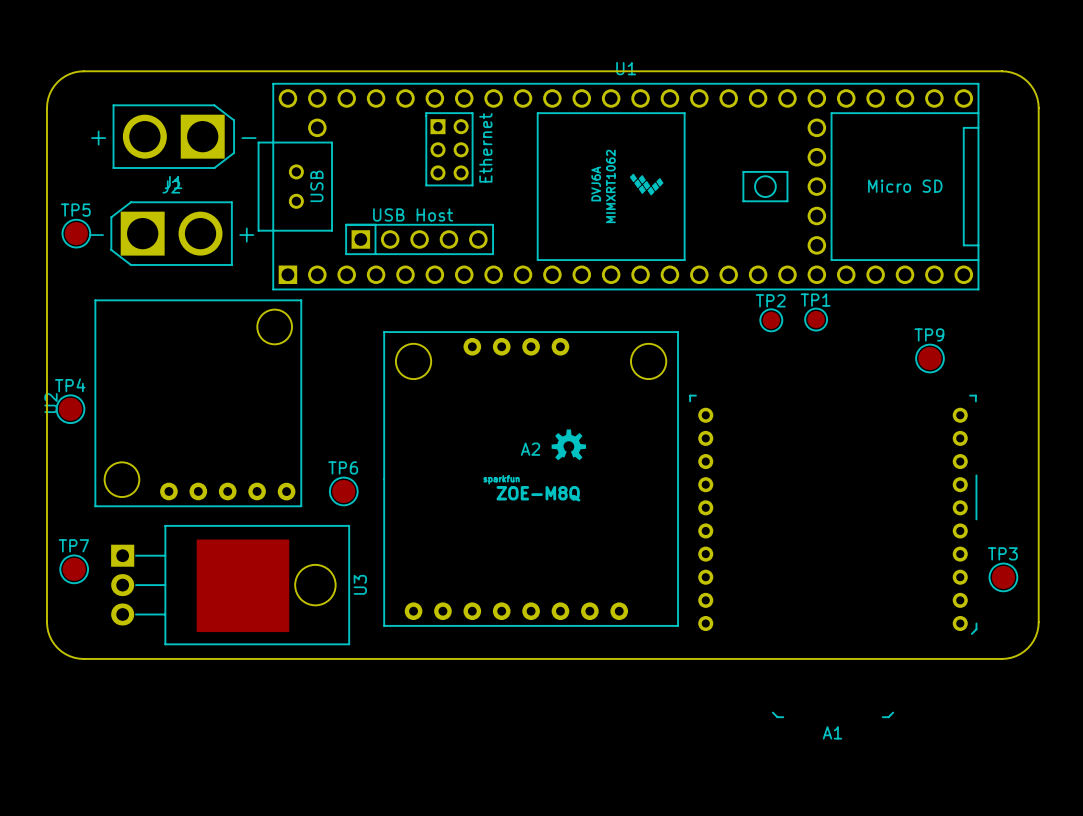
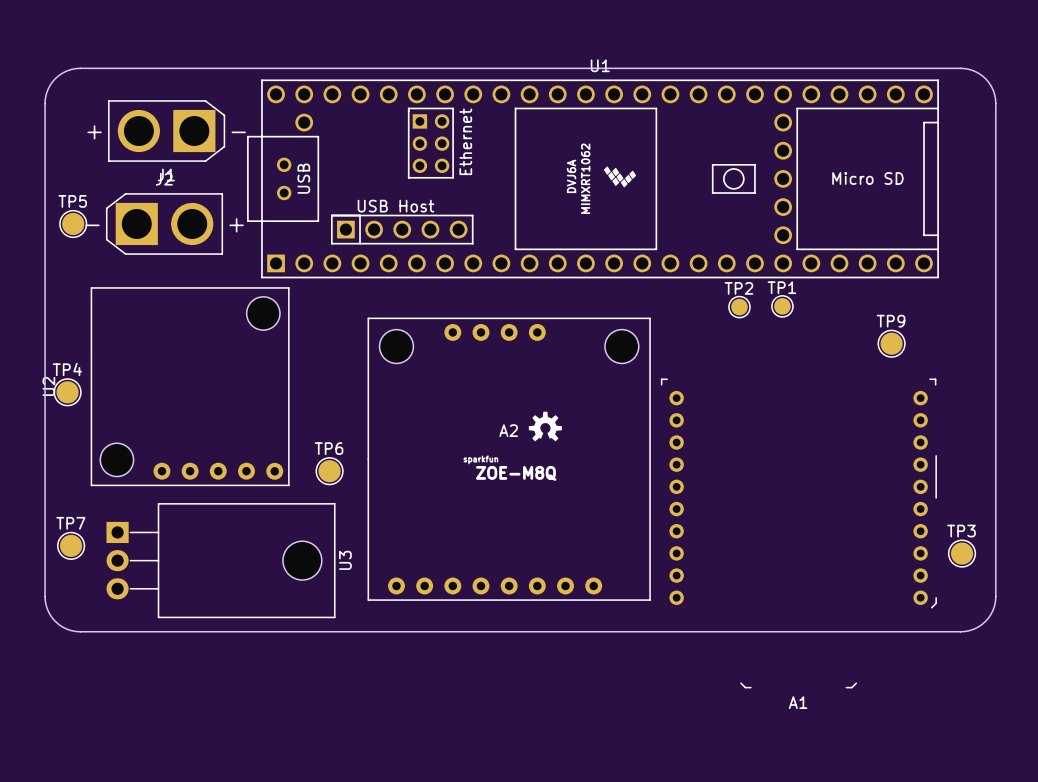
U3 footprint: [111, 525, 350, 646] -> [106, 503, 336, 619]

